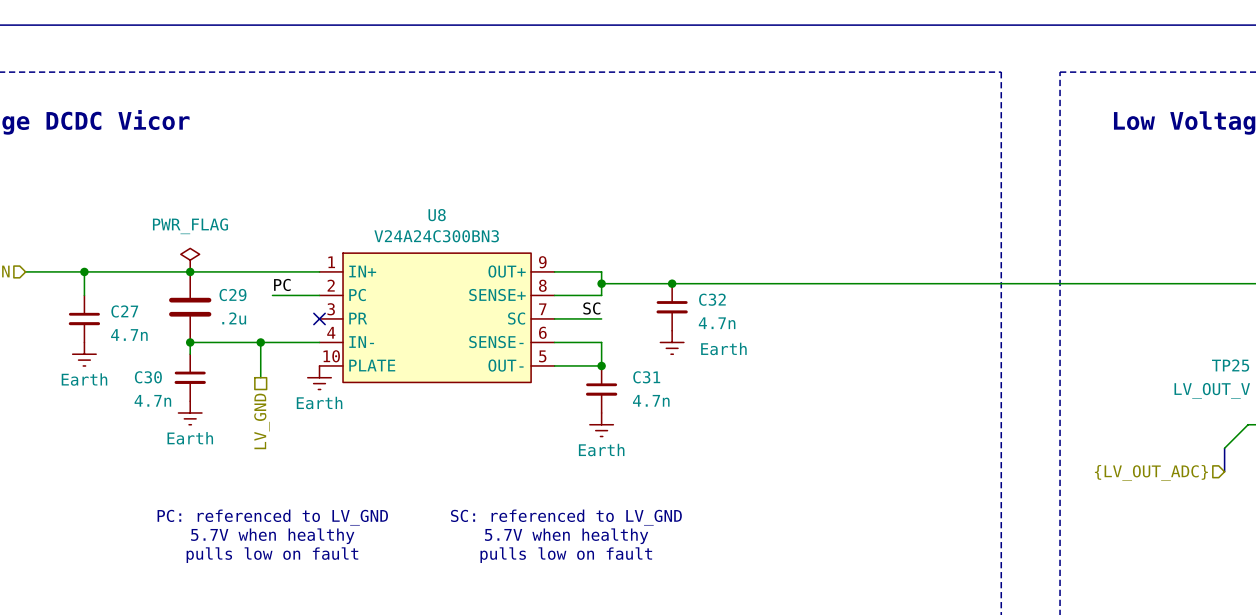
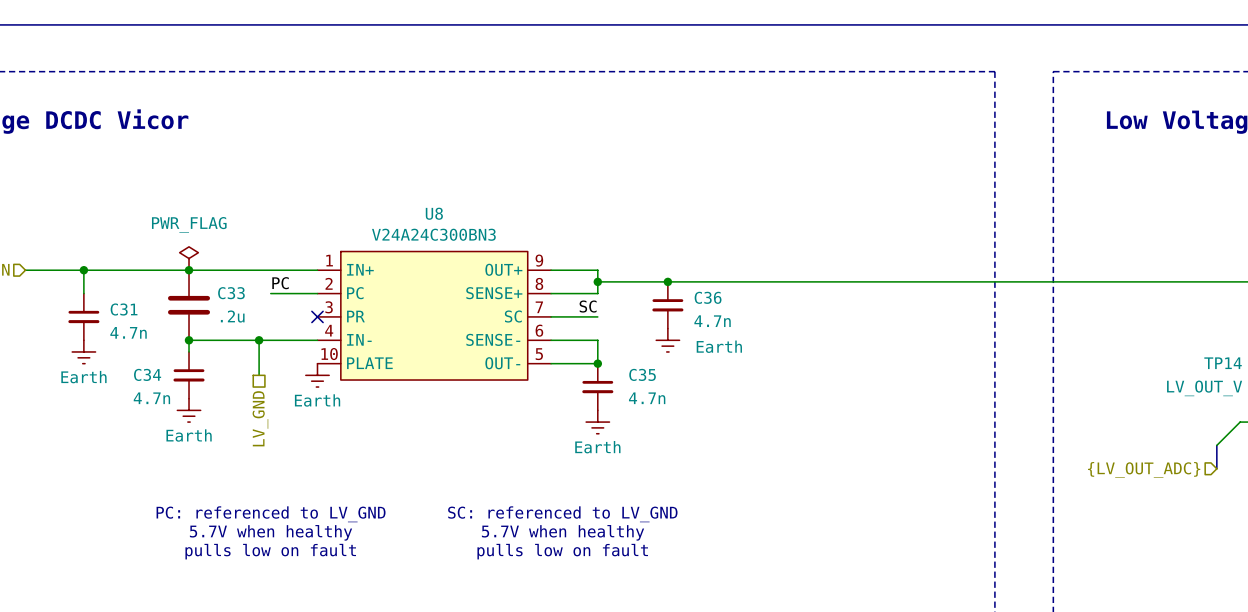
C29 name: C29 (232, 295) -> C33 (231, 293)
C32 name: C32 (712, 299) -> C36 (708, 297)
C27 name: C27 (124, 311) -> C31 (124, 309)
TP25 name: TP25 (1230, 365) -> TP14 (1223, 363)
C30 name: C30 (148, 377) -> C34 (147, 374)
C31 name: C31 (646, 377) -> C35 (642, 374)

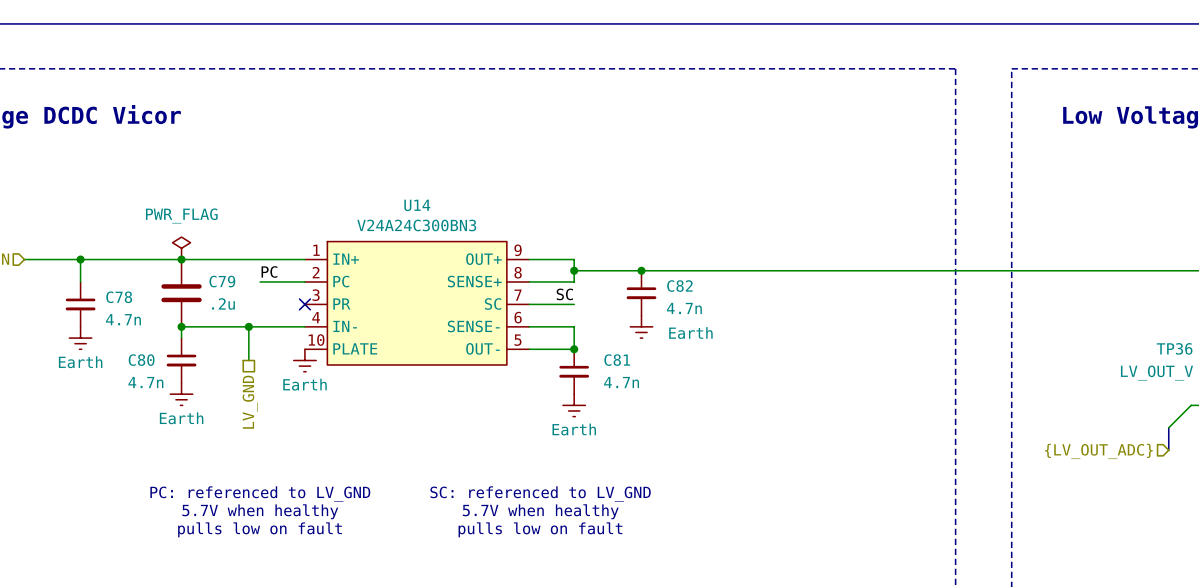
U8 name: U8 (434, 213) -> U14 (417, 205)
C33 name: C33 (231, 293) -> C79 (222, 281)
C36 name: C36 (708, 297) -> C82 (679, 286)
C31 name: C31 (124, 309) -> C78 (119, 297)
TP14 name: TP14 (1223, 363) -> TP36 (1174, 348)
C34 name: C34 (147, 374) -> C80 (141, 360)
C35 name: C35 (642, 374) -> C81 (617, 360)

